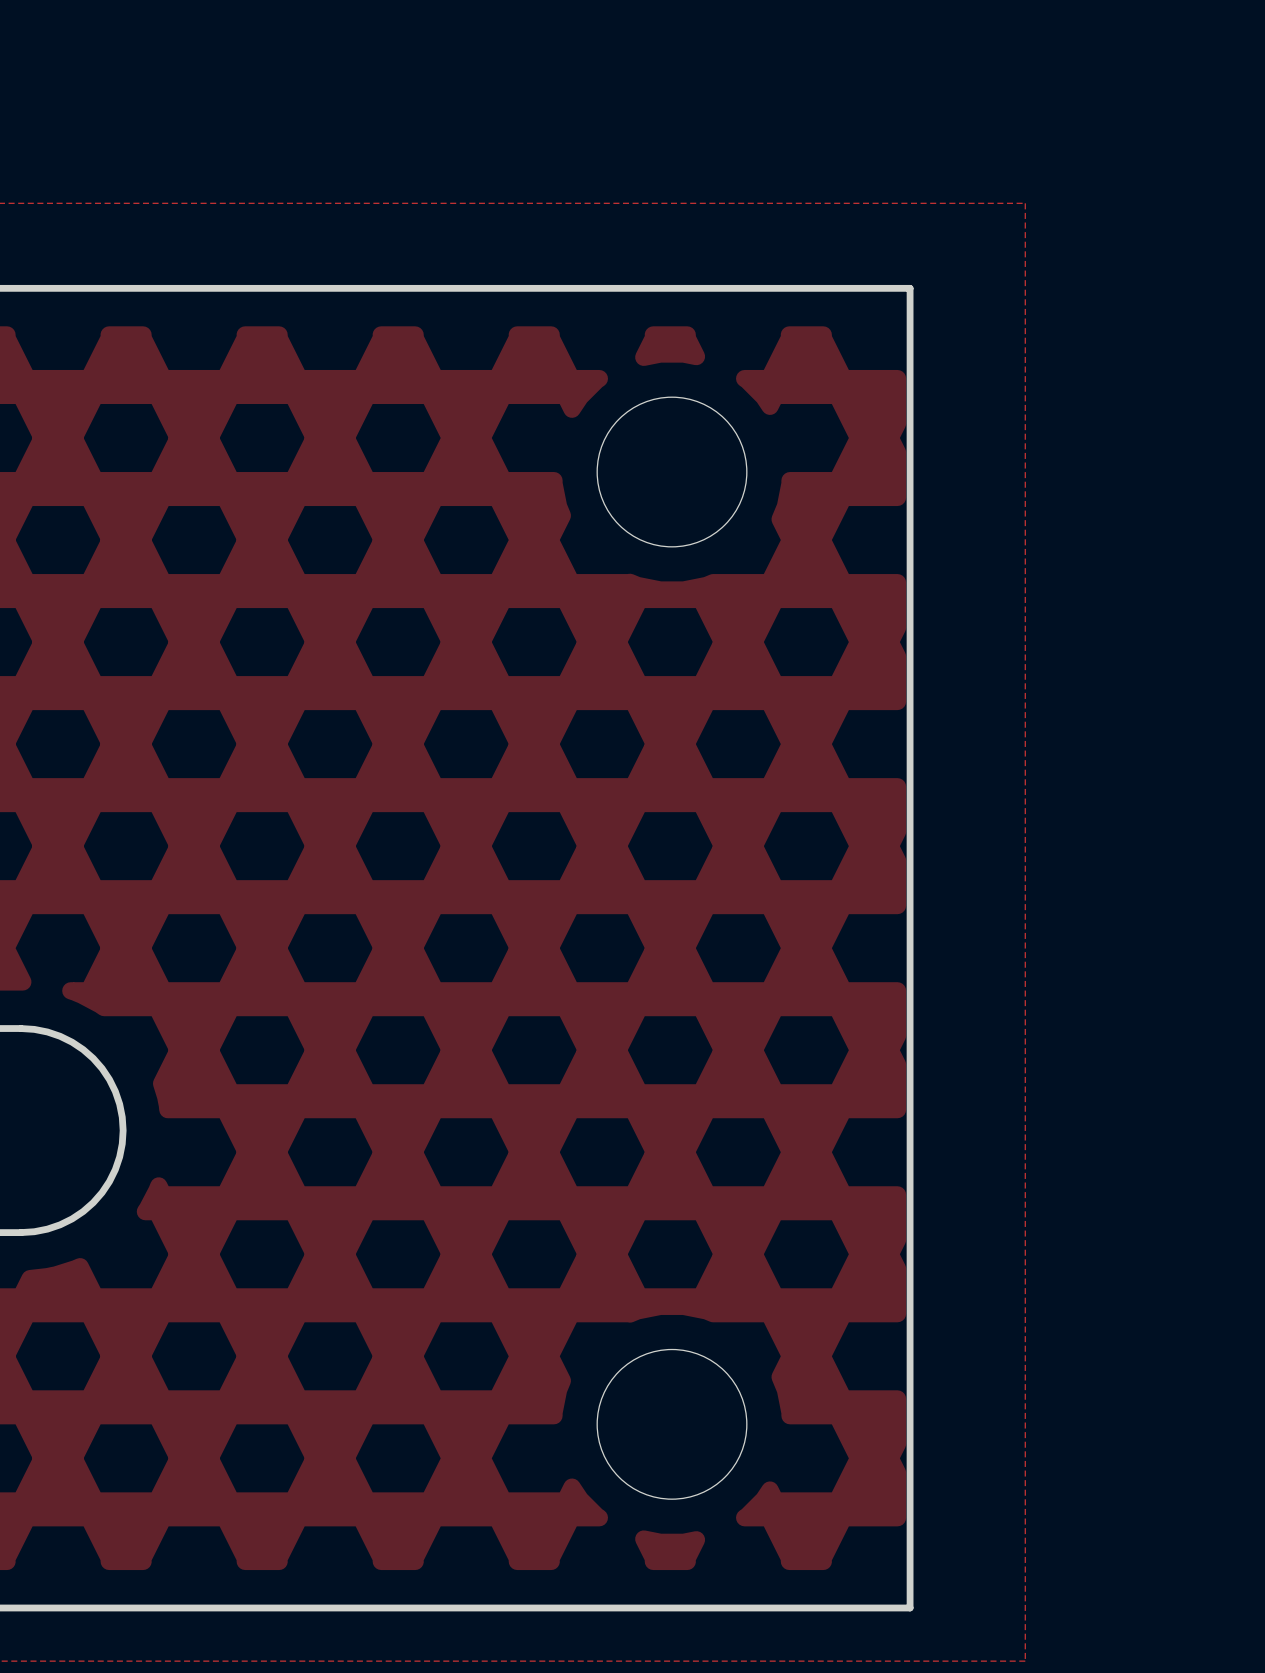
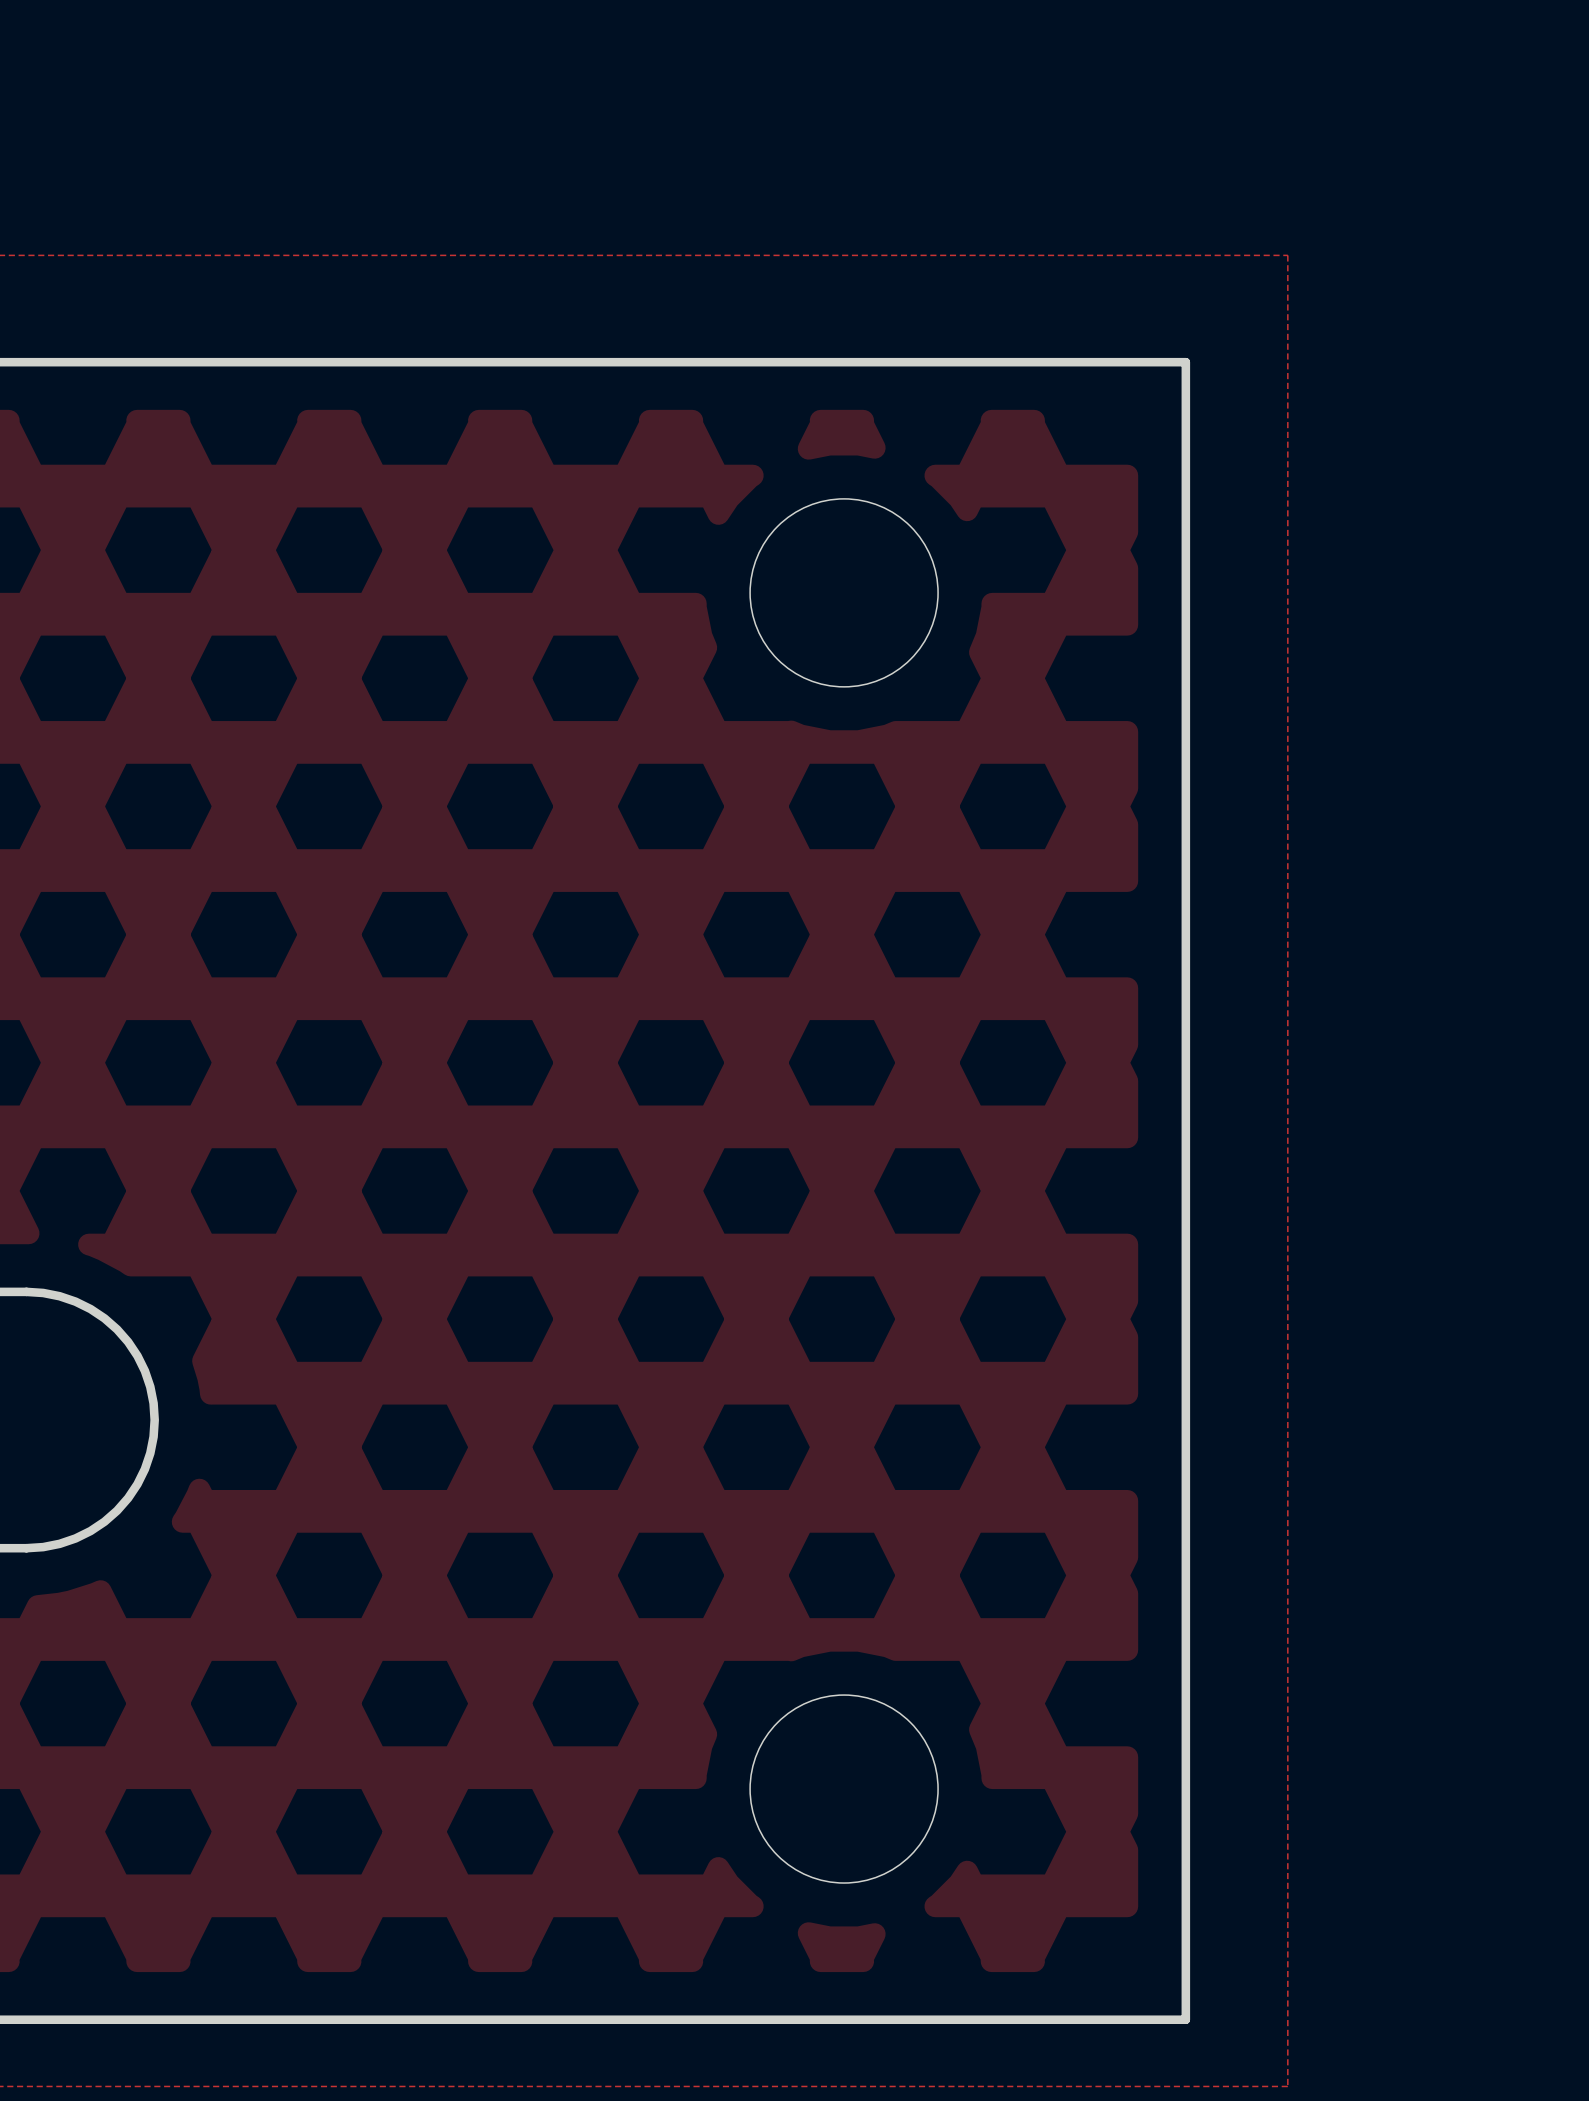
board edge: (910, 288) (910, 1607) -> (1143, 362) (1185, 362) (1185, 2019) (1143, 2019)

